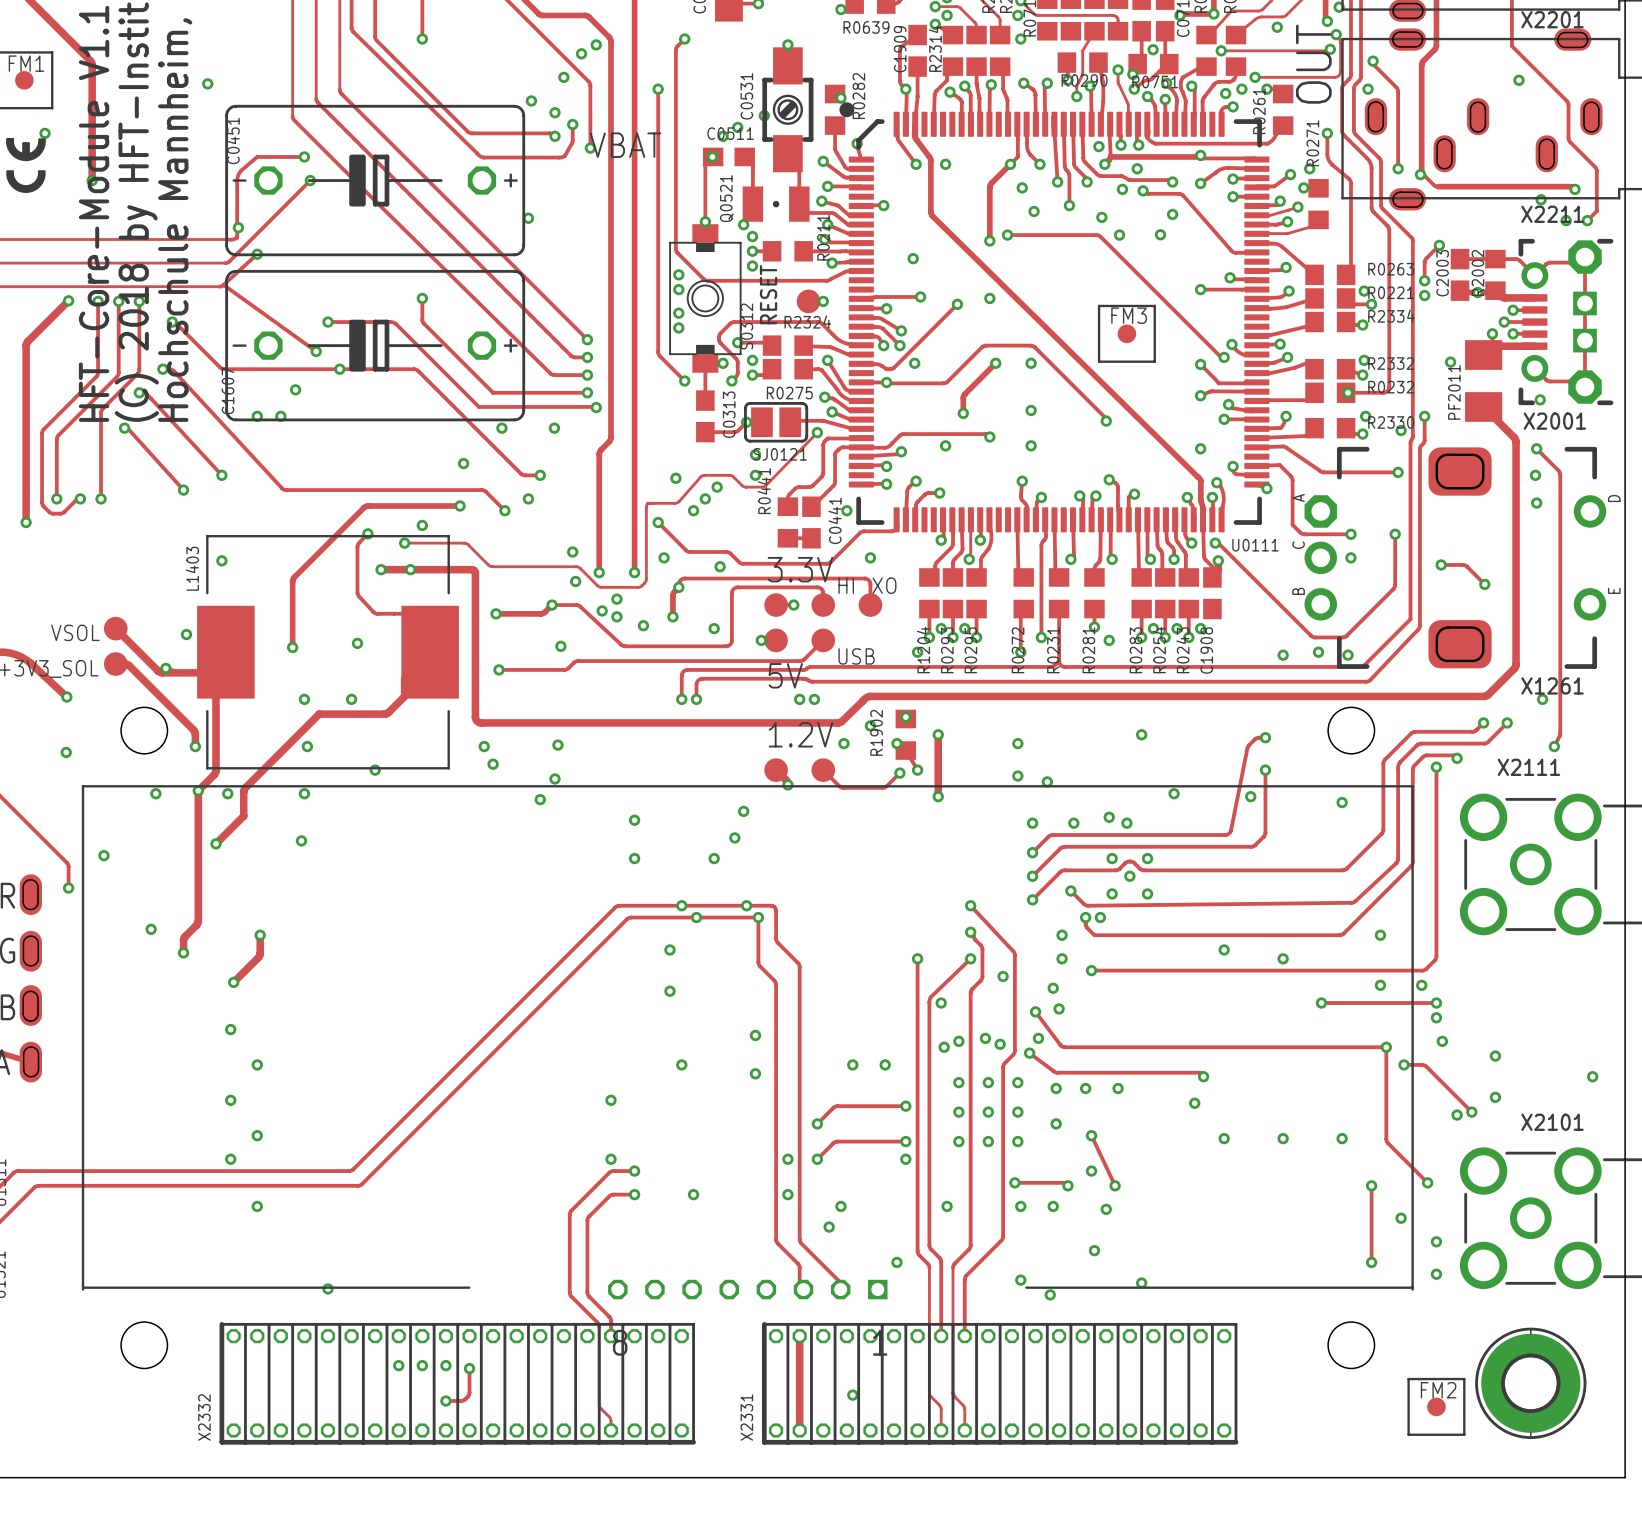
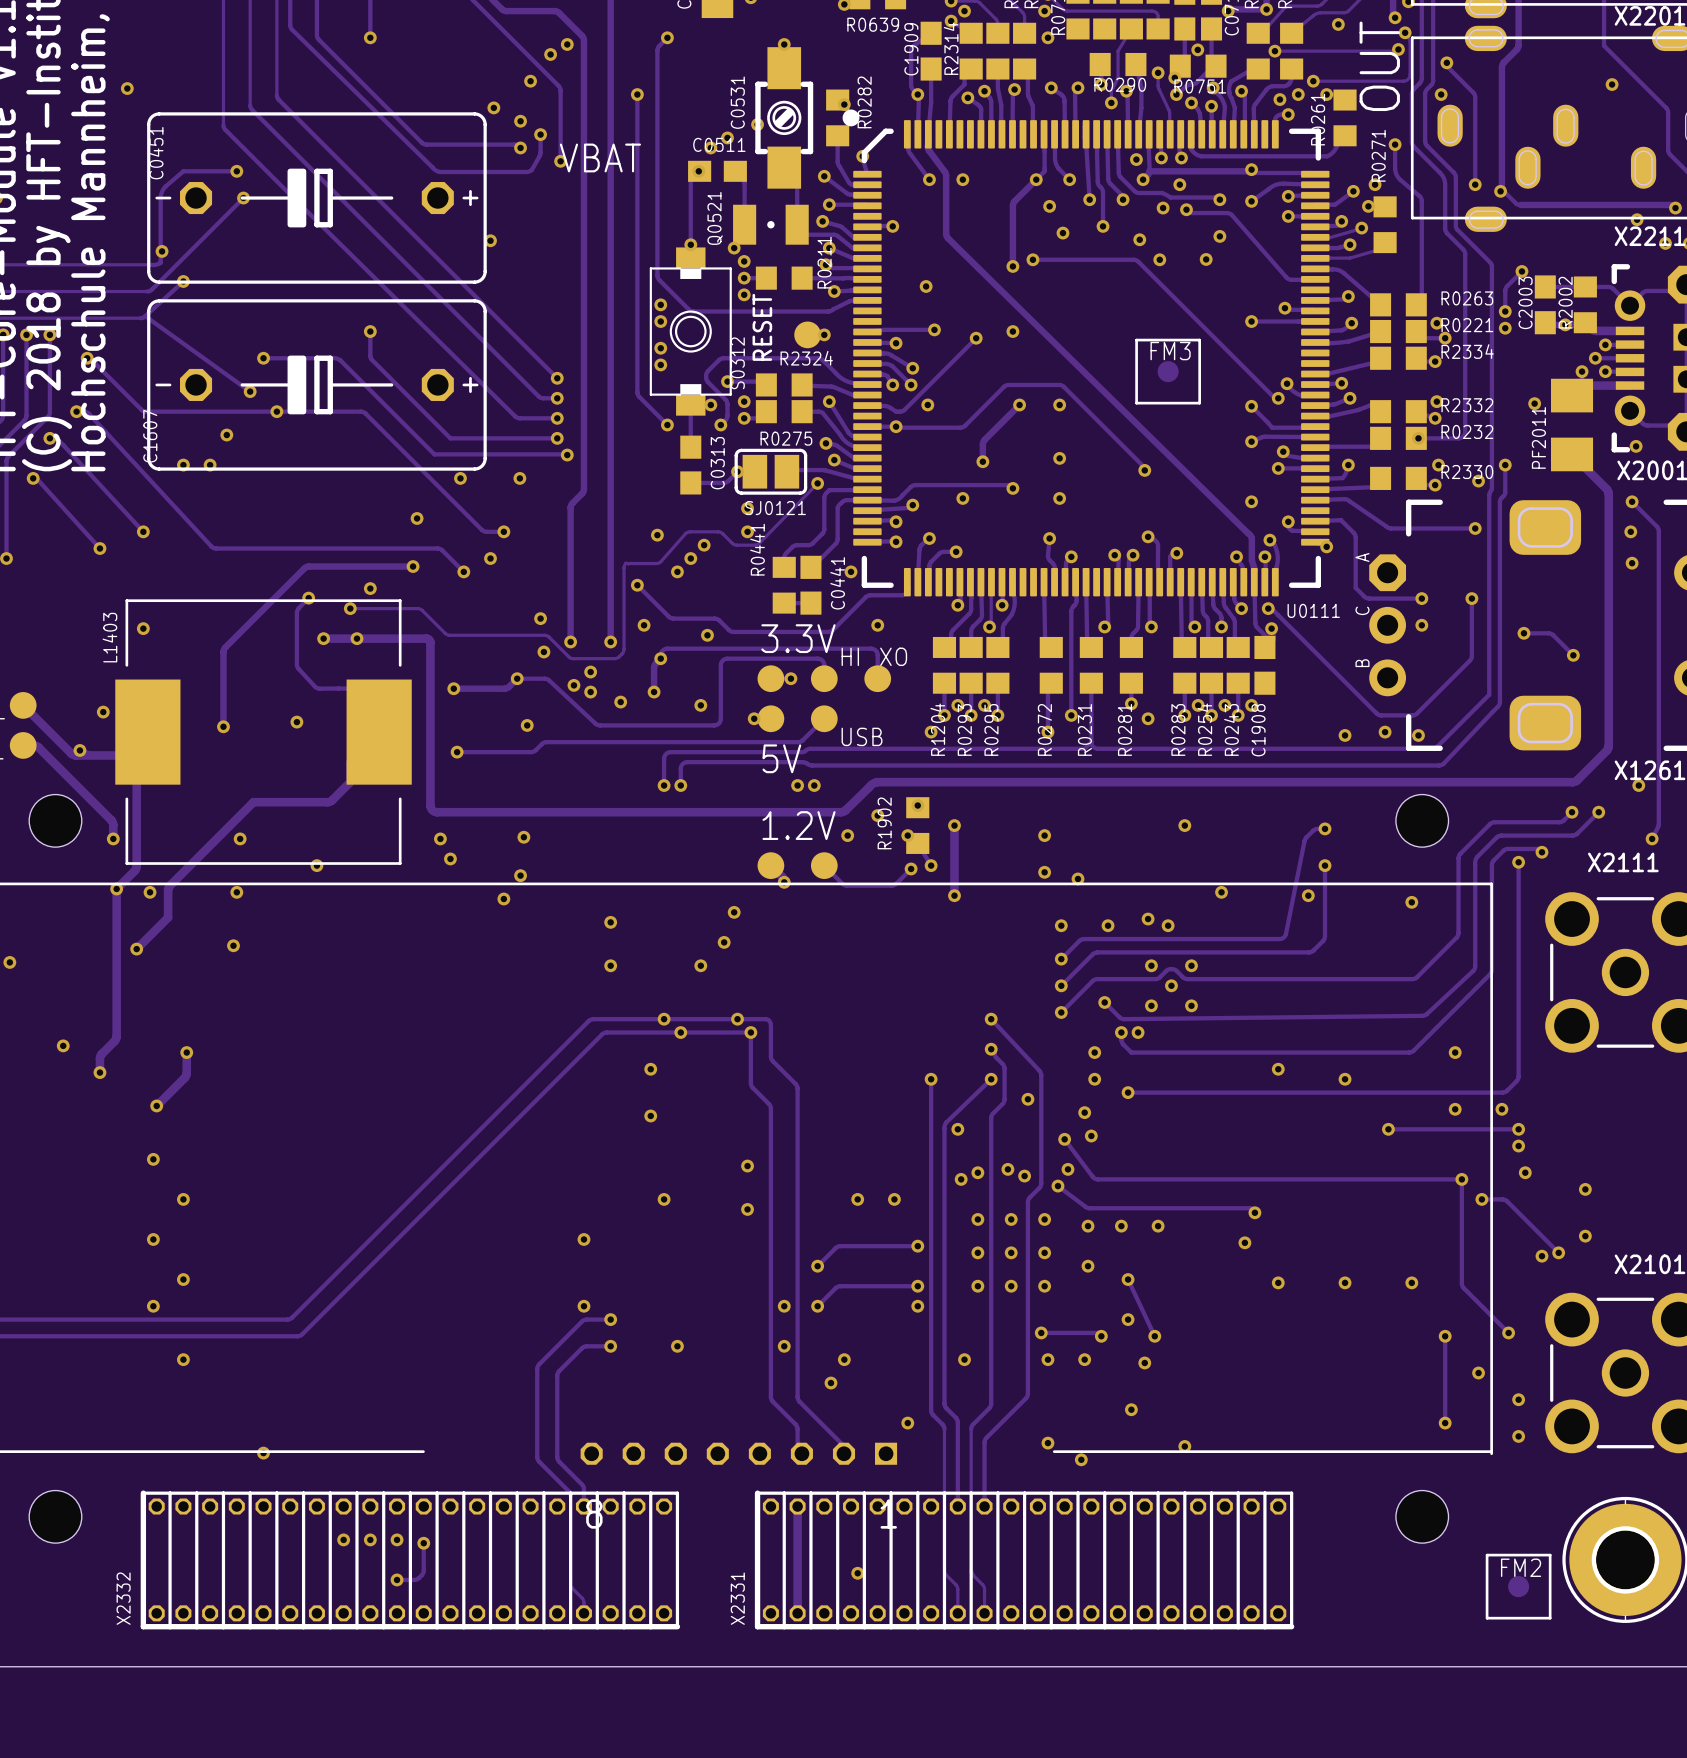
via: (304, 699) -> none
via: (351, 699) -> none
via: (155, 793) -> none

